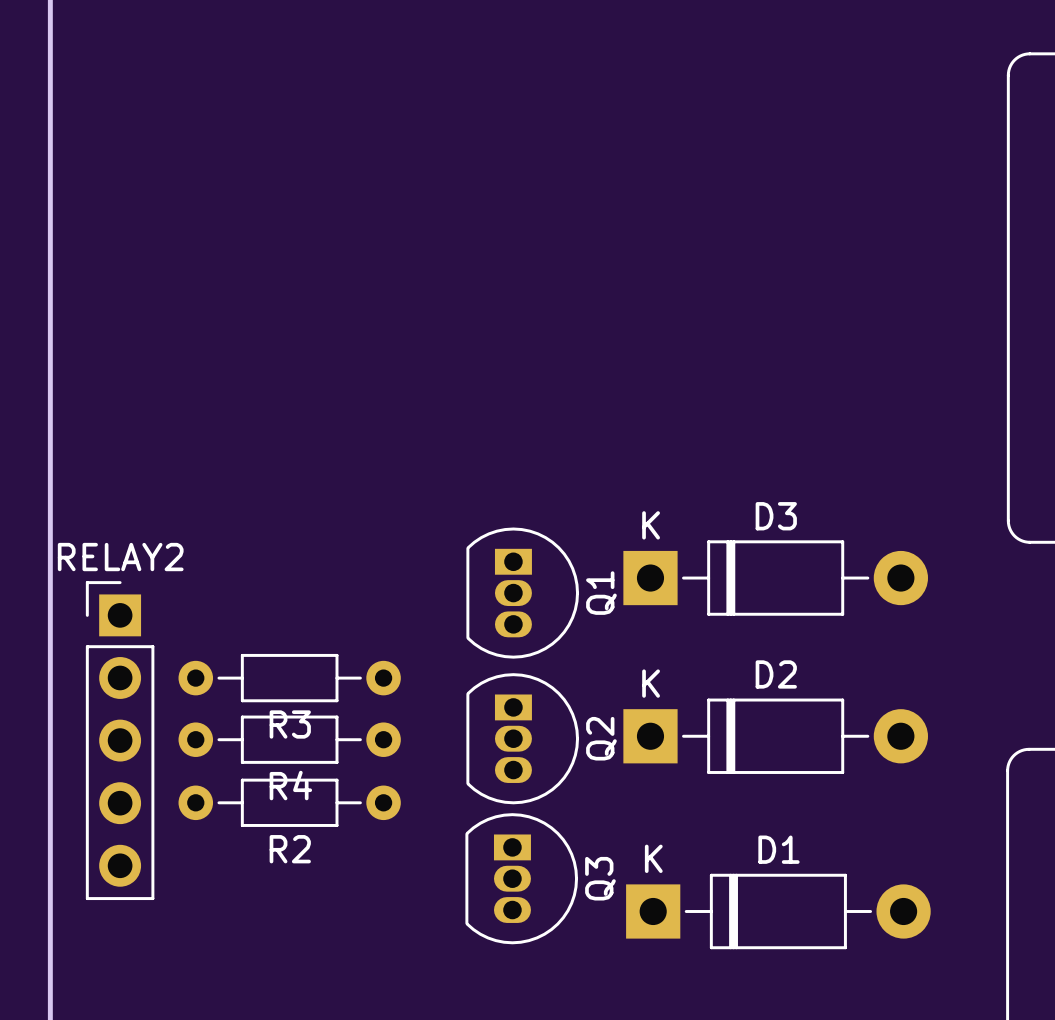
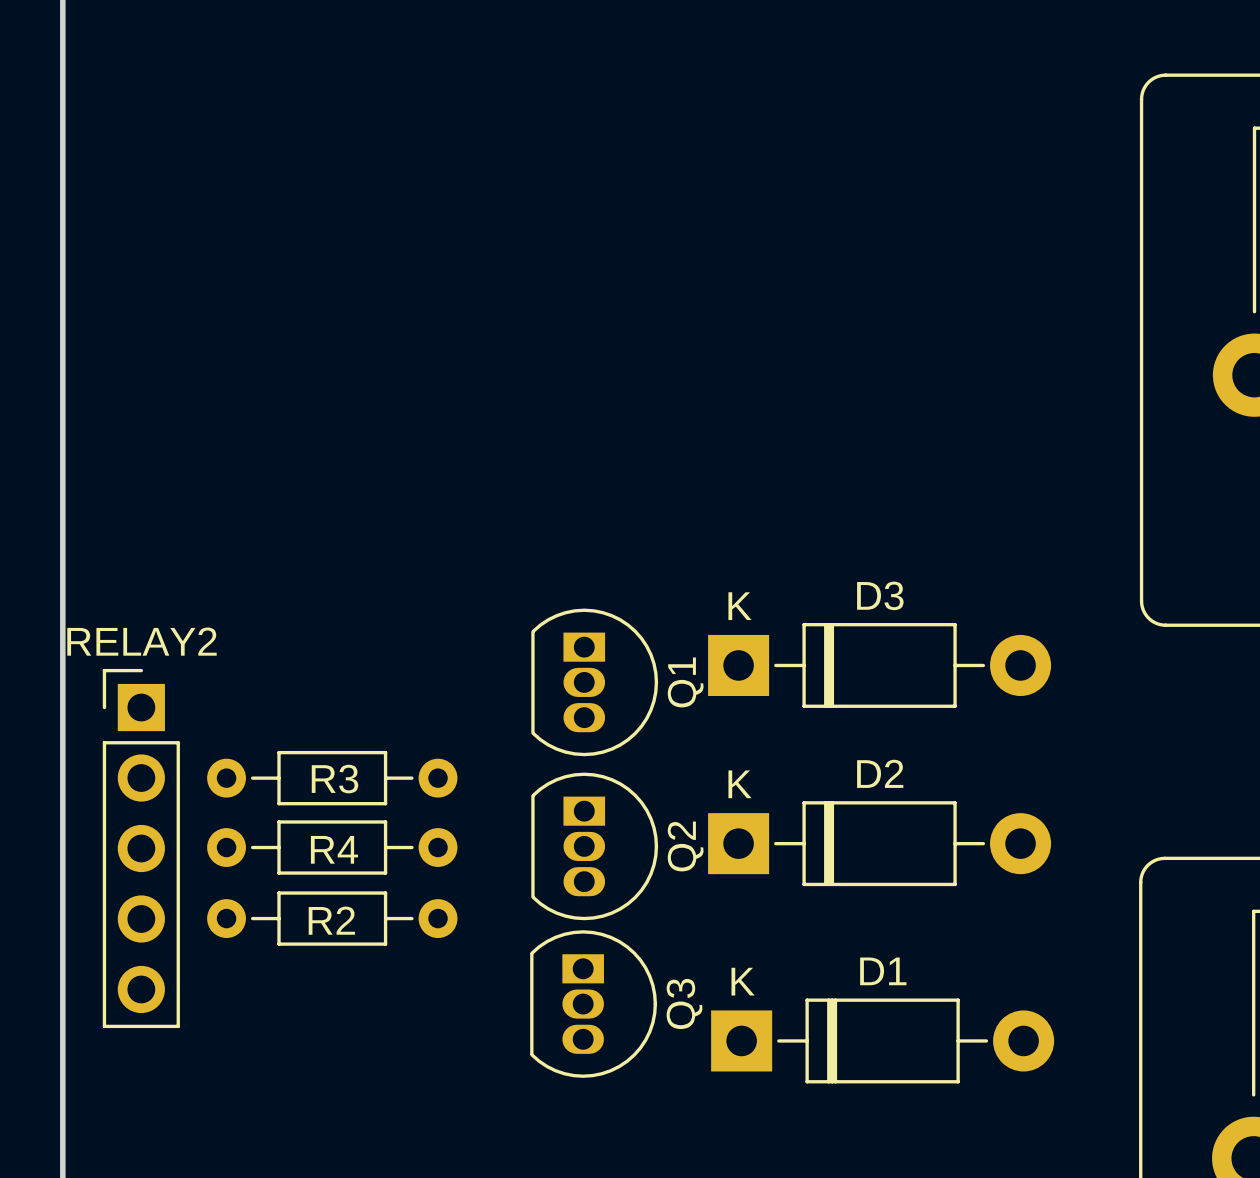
R3 name position: R3 (290, 724) -> R3 (335, 779)
R4 name position: R4 (290, 785) -> R4 (334, 849)
R2 name position: R2 (290, 849) -> R2 (331, 920)

